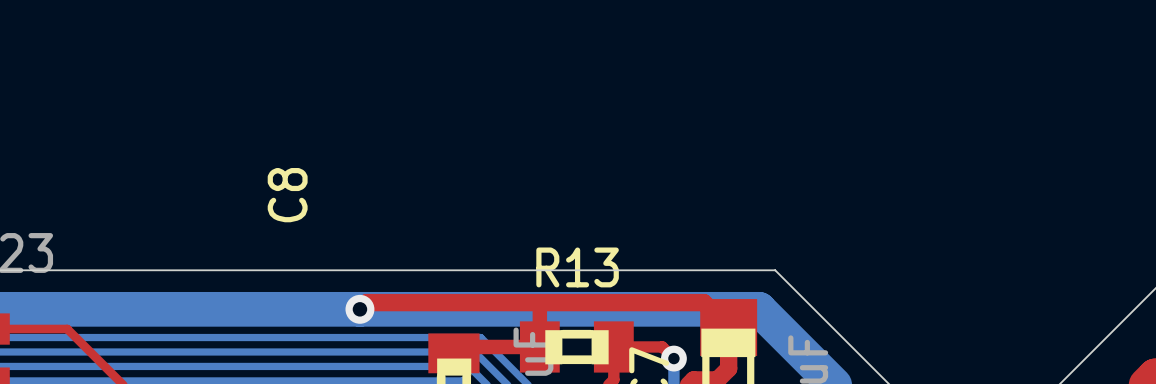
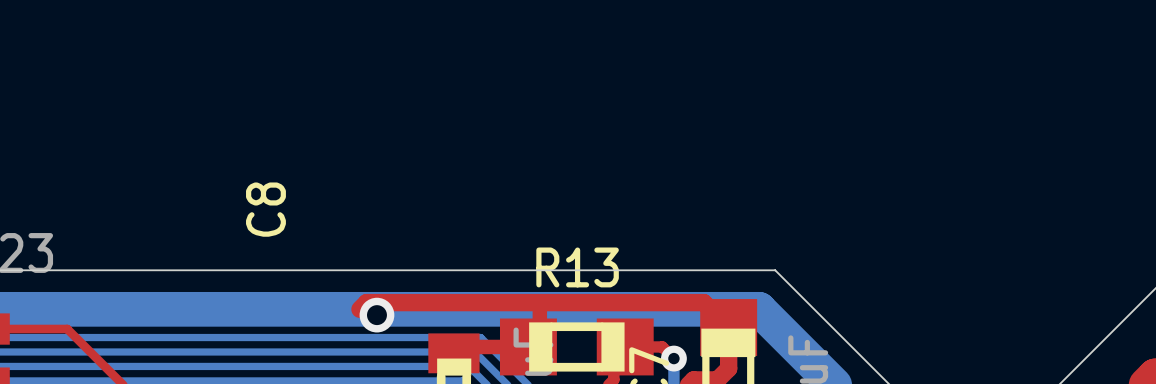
C8 name position: C8 (287, 195) -> C8 (265, 209)
via position: (359, 309) -> (376, 315)
R13 footprint: [519, 321, 634, 373] -> [499, 318, 654, 376]

